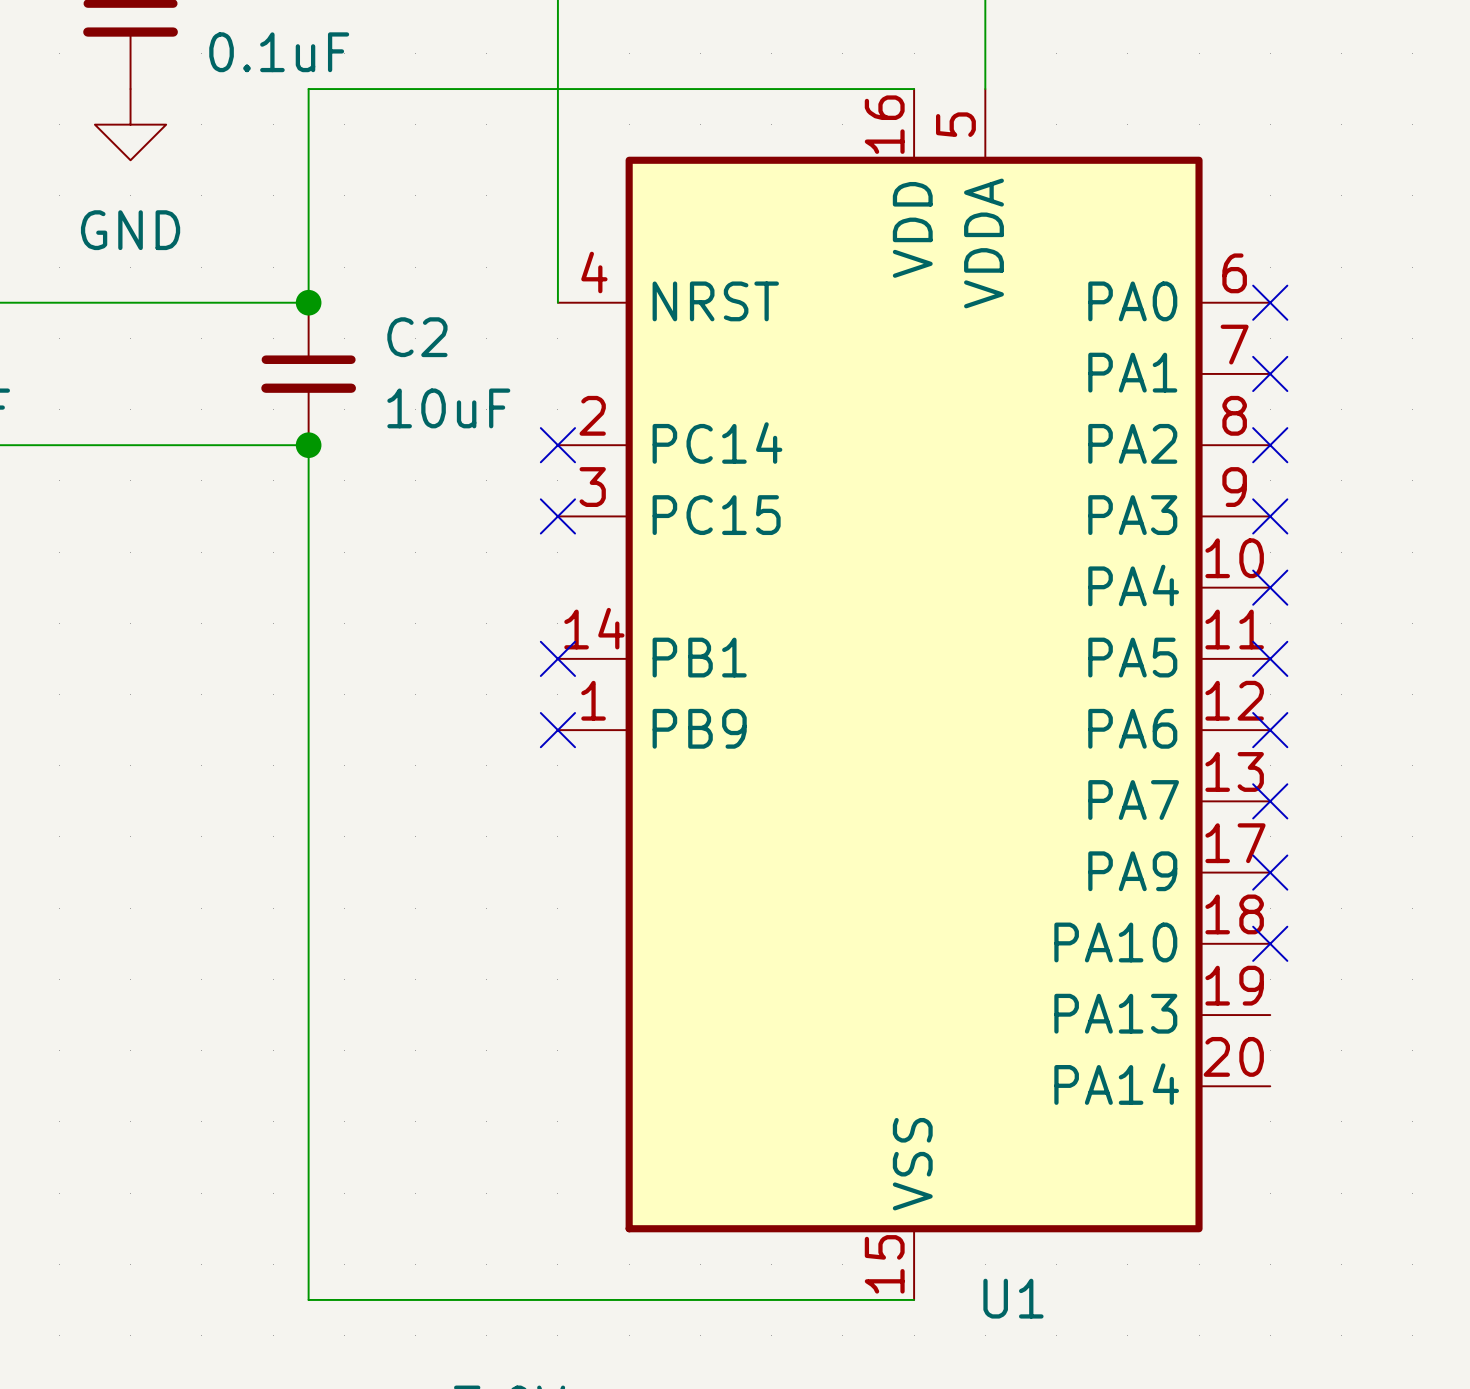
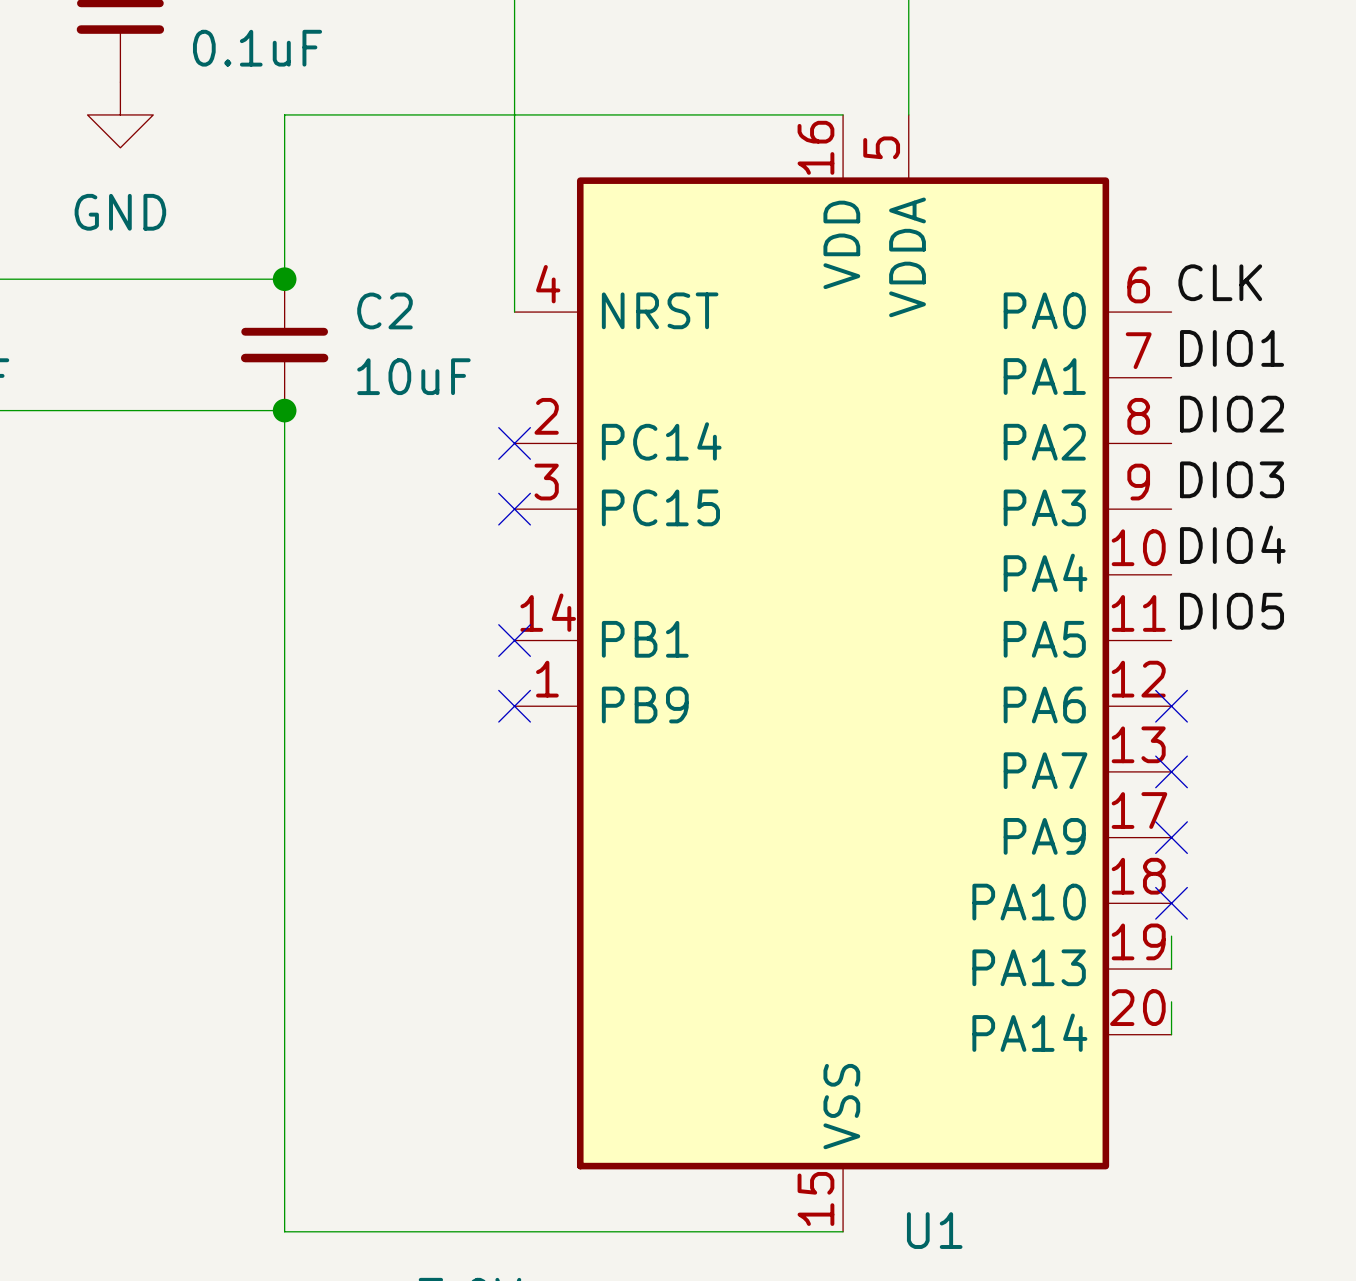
wire: (914, 89) (308, 89) (308, 124) -> (843, 114) (284, 114)
wire: none -> (514, 279) (514, 312)
no-connect mark: (1270, 302) -> none
label: none -> CLK (1220, 282)
no-connect mark: (1270, 373) -> none
label: none -> DIO1 (1232, 348)
no-connect mark: (557, 445) -> none
no-connect mark: (1270, 445) -> none
label: none -> DIO2 (1232, 414)
no-connect mark: none -> (514, 443)
no-connect mark: (557, 516) -> none
no-connect mark: (1270, 516) -> none
label: none -> DIO3 (1232, 479)
no-connect mark: none -> (514, 509)
no-connect mark: (1270, 587) -> none
label: none -> DIO4 (1232, 544)
no-connect mark: (557, 658) -> none
no-connect mark: (1270, 658) -> none
label: none -> DIO5 (1232, 611)
no-connect mark: none -> (514, 640)
U1 position: (914, 694) -> (843, 673)
no-connect mark: (557, 730) -> none
no-connect mark: (1270, 730) -> none
no-connect mark: none -> (514, 706)
no-connect mark: none -> (1171, 706)
no-connect mark: (1270, 801) -> none
no-connect mark: none -> (1171, 771)
no-connect mark: (1270, 872) -> none
no-connect mark: none -> (1171, 837)
no-connect mark: (1270, 943) -> none
no-connect mark: none -> (1171, 903)
wire: none -> (1171, 936) (1171, 969)
wire: none -> (1171, 1001) (1171, 1034)
wire: (308, 1299) (914, 1299) -> (284, 1198) (284, 1231) (843, 1231)

